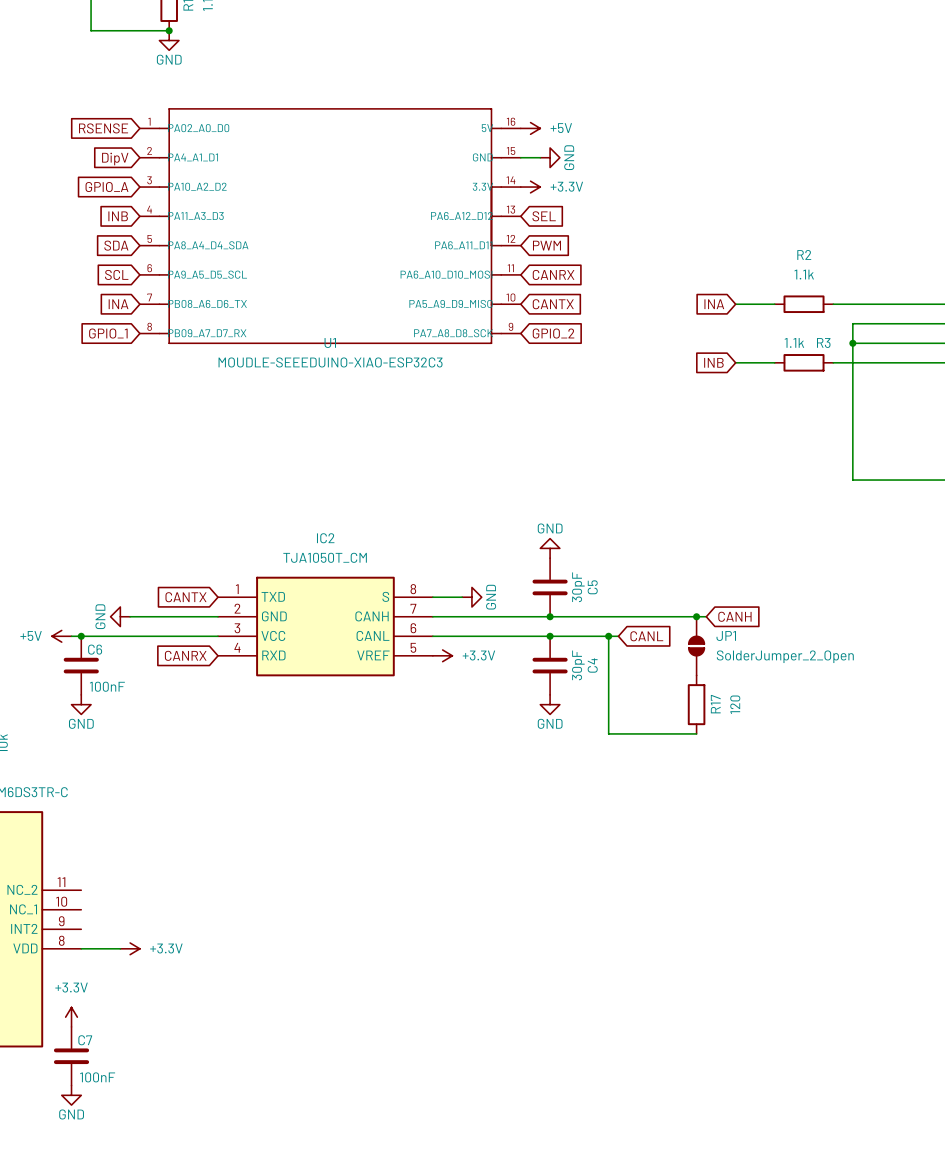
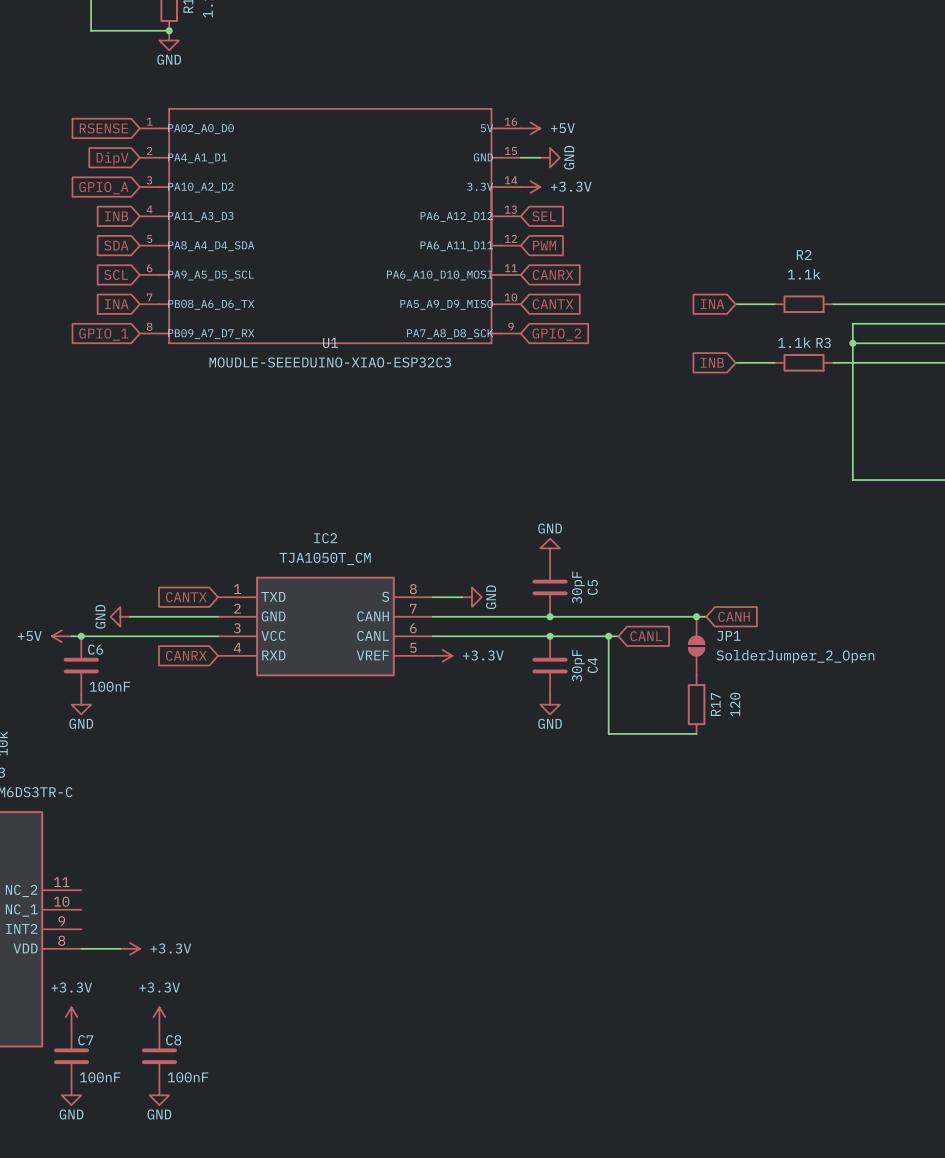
power symbol: none -> +3.3V (159, 1017)
C8: none -> 100nF (159, 1056)
power symbol: none -> GND (159, 1095)

